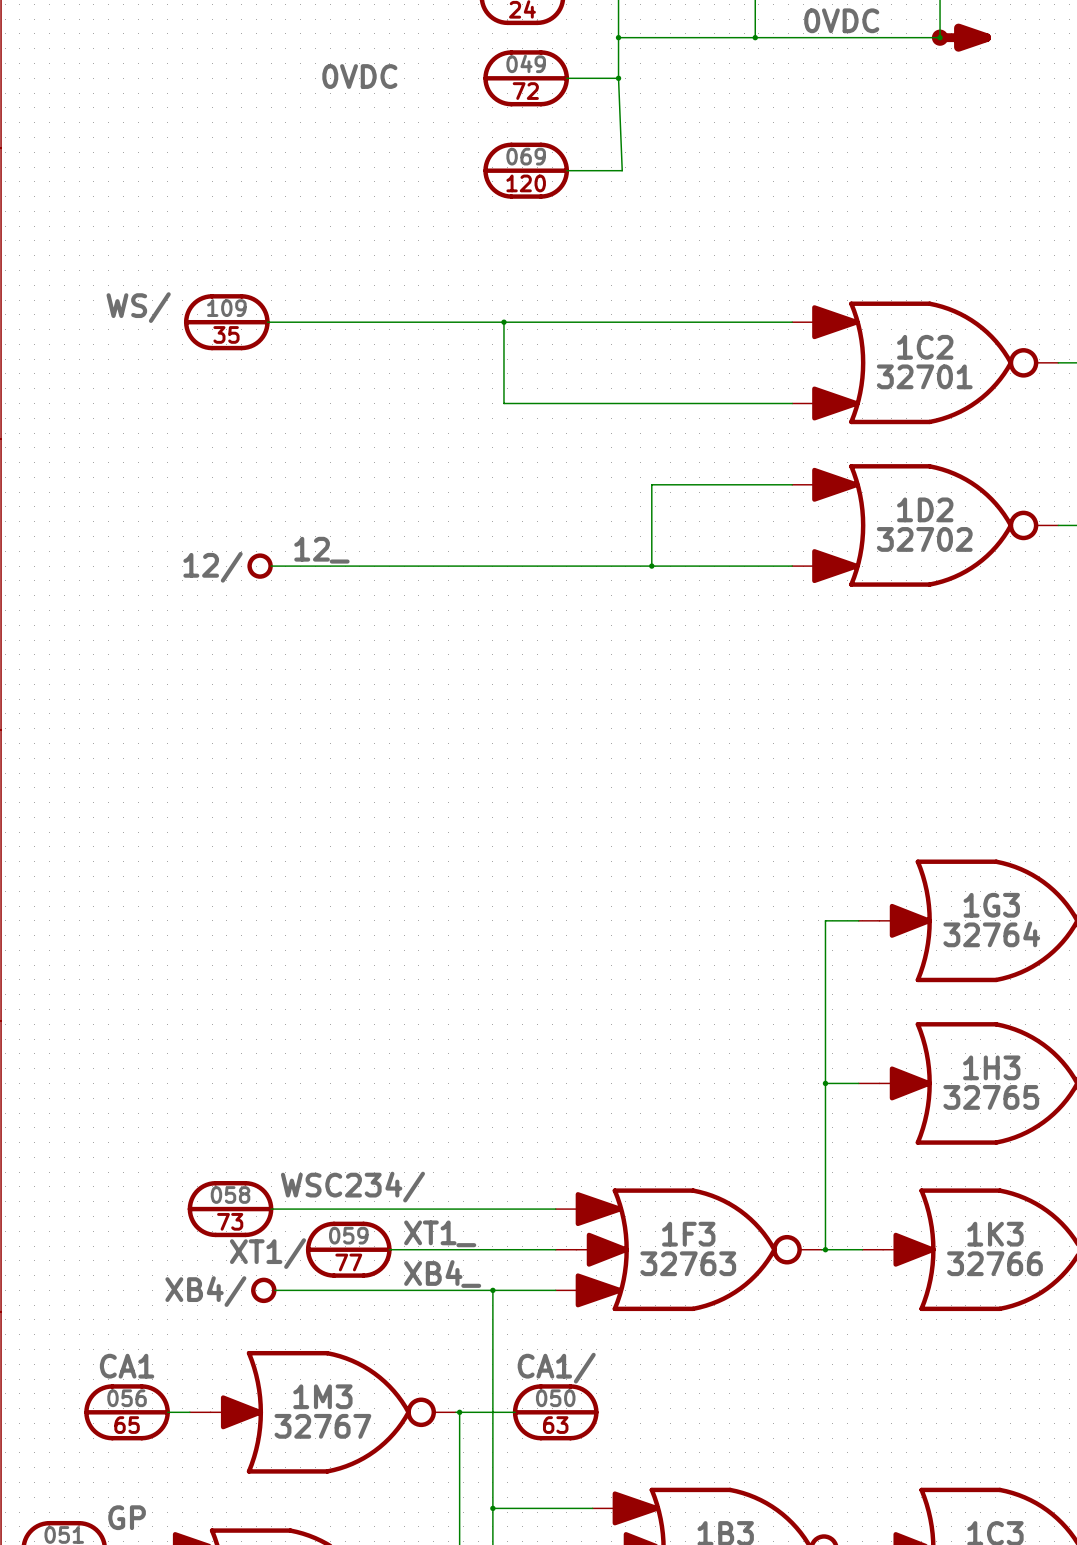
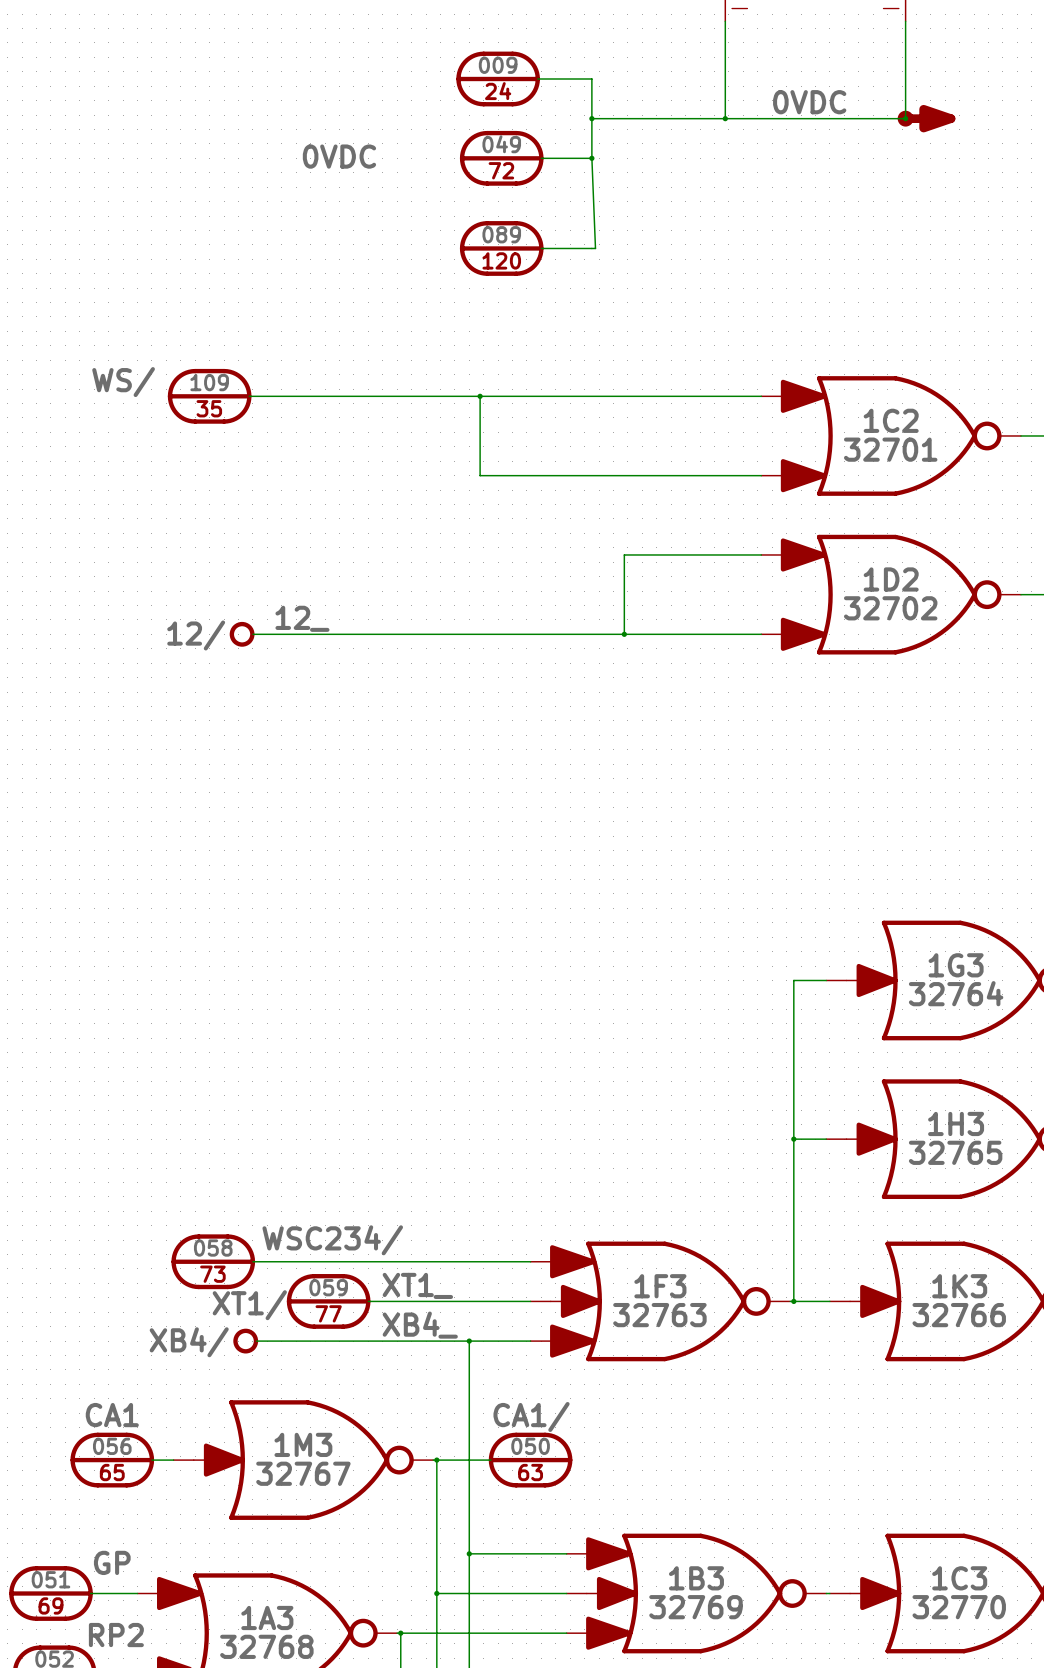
part text: 069 (526, 156) -> 089 (501, 234)

